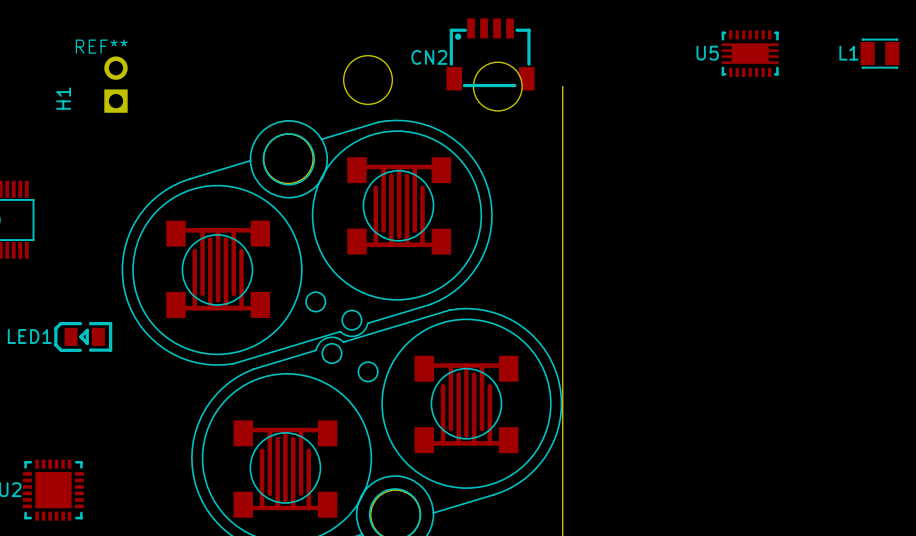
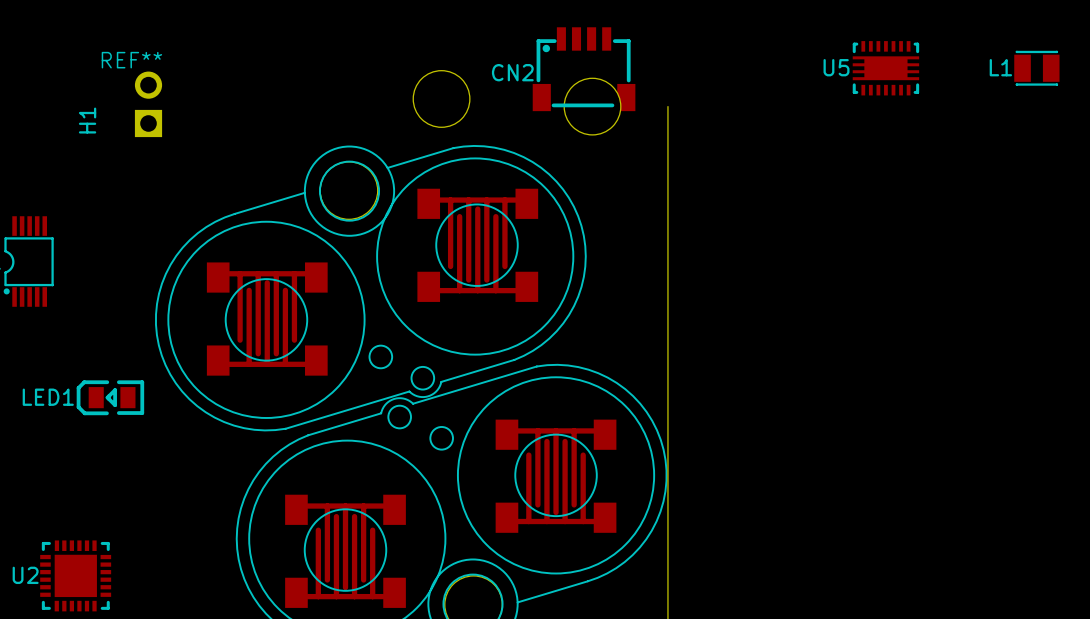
part rotation: 0° (399, 205) -> 180° (477, 245)
part rotation: 0° (218, 269) -> 180° (267, 319)

